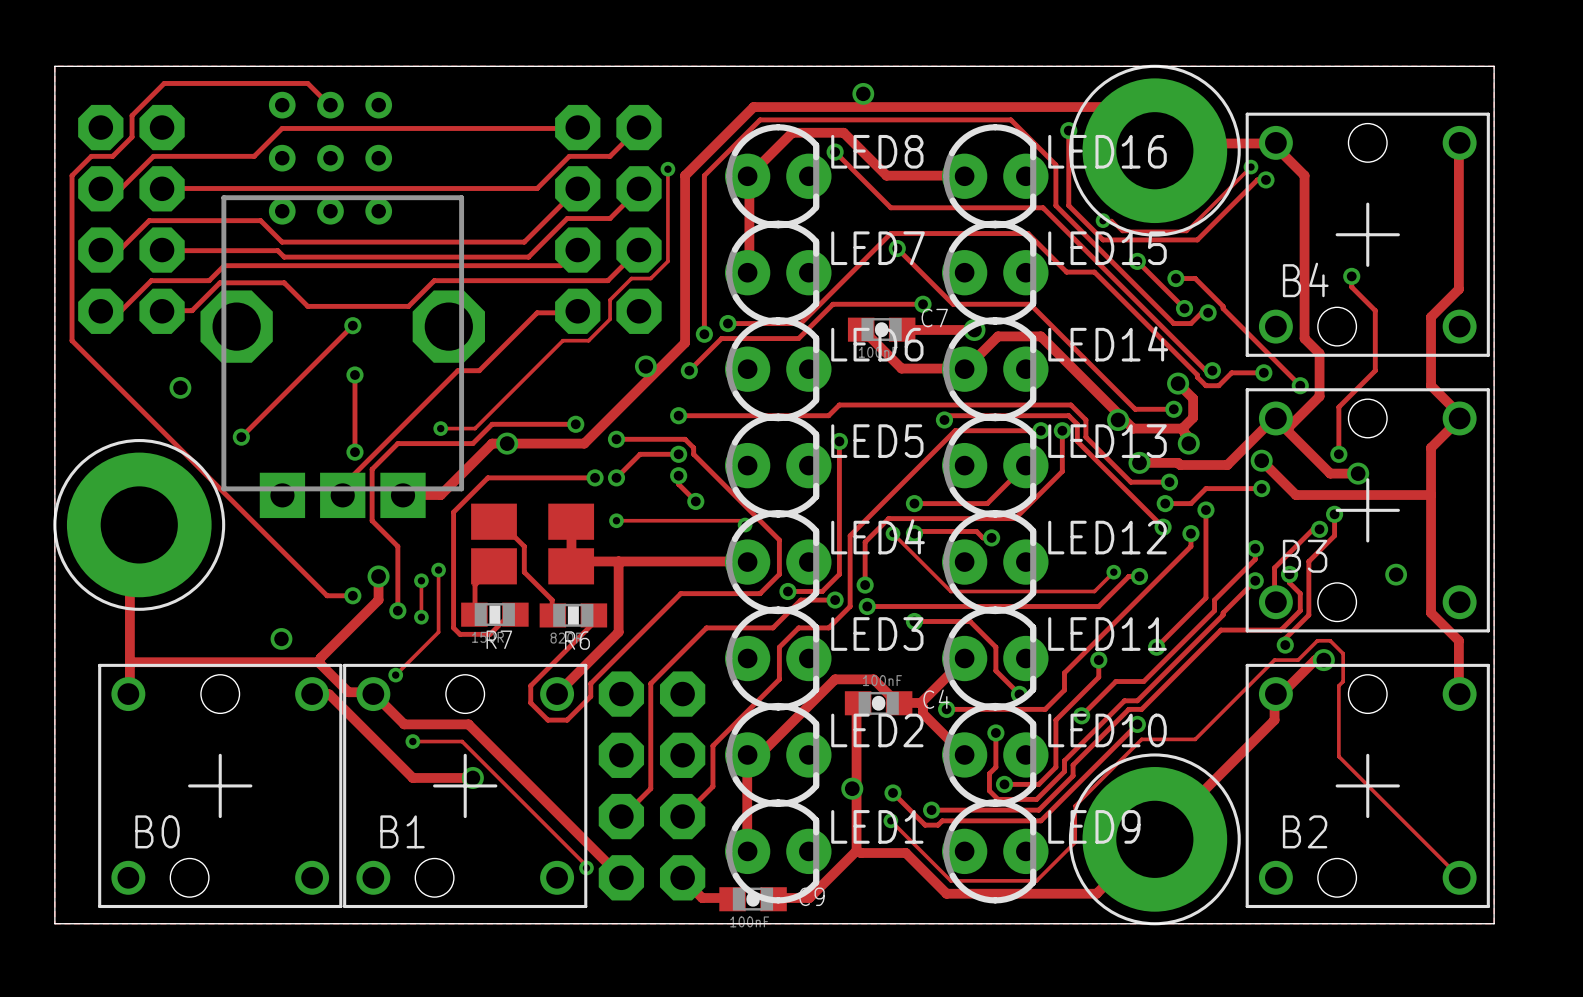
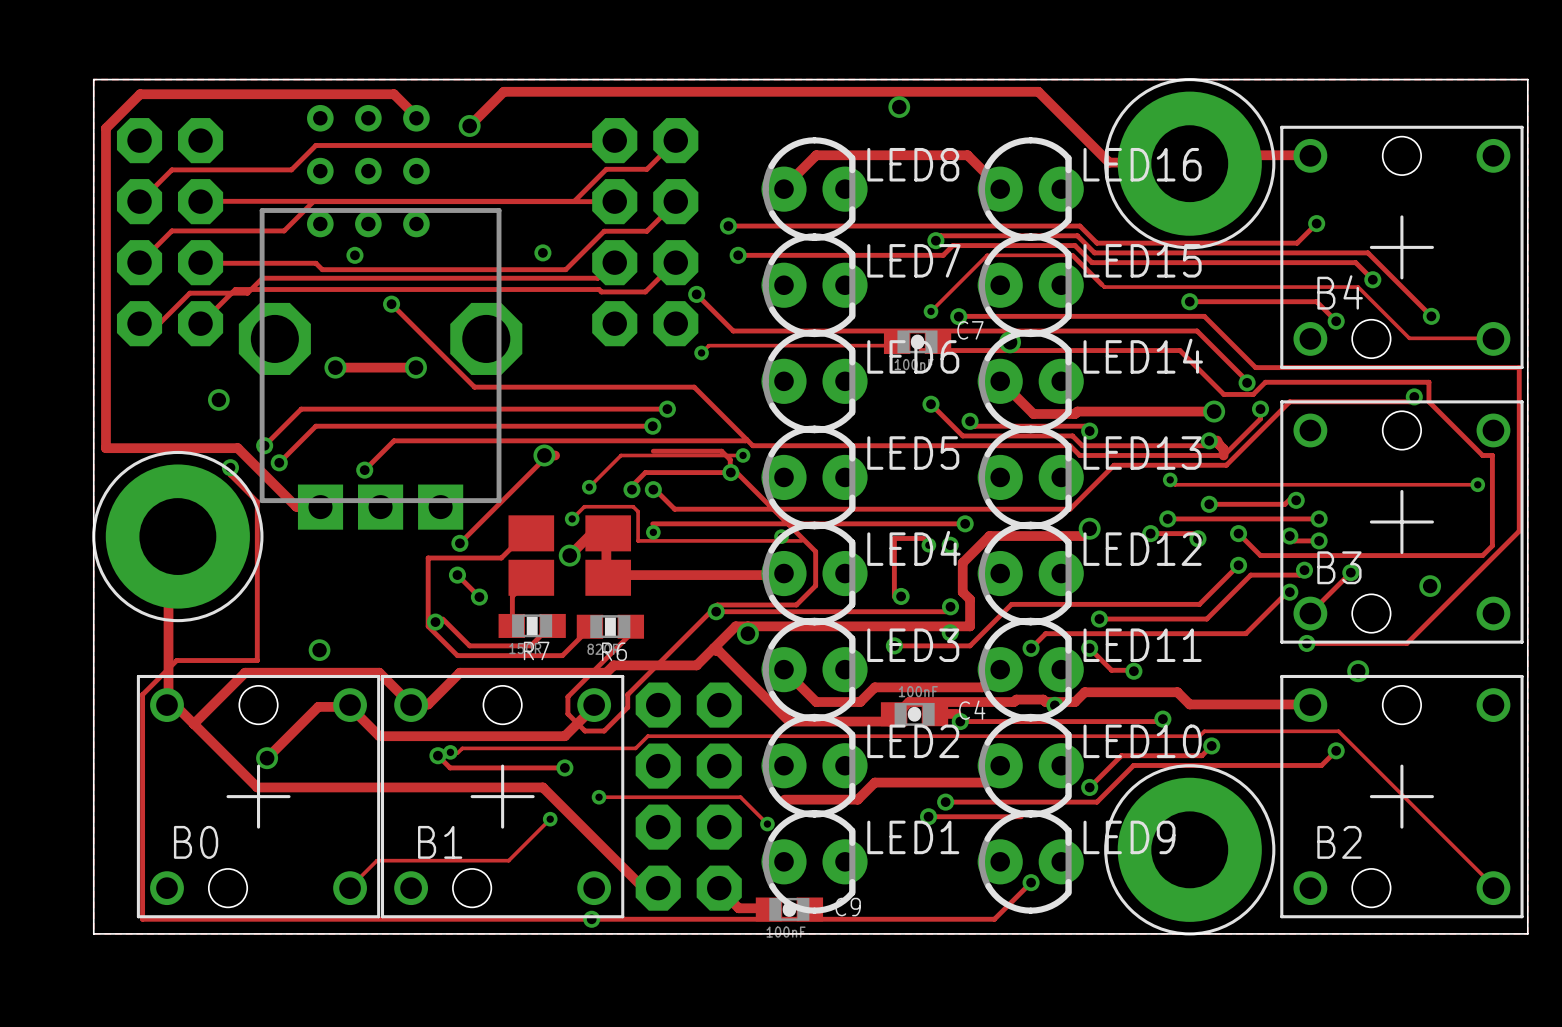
track: (330, 105) (307, 83) (164, 83) (132, 115) (132, 137) (112, 156) (91, 156) (72, 175) (72, 340) (327, 595) (352, 595) -> none
track: none -> (416, 118) (394, 94) (140, 94) (105, 128) (105, 448) (237, 448) (296, 506) (320, 507)
track: none -> (469, 125) (503, 91) (1038, 91) (1109, 162) (1206, 162) (1214, 155) (1310, 155)
via: none -> (469, 125)
track: (577, 127) (282, 128) (254, 156) (153, 156) (121, 188) (100, 188) -> (614, 140) (608, 145) (315, 145) (291, 169) (171, 169) (139, 201)
track: (1068, 130) (1068, 205) (1103, 239) (1197, 239) (1257, 179) (1265, 179) -> none
via: (1068, 130) -> none
track: (1459, 142) (1458, 289) (1431, 317) (1431, 385) (1458, 413) (1459, 418) (1431, 447) (1431, 612) (1458, 640) (1459, 694) -> none
track: (835, 152) (890, 207) (1043, 207) (1205, 370) (1212, 370) -> none
via: (835, 152) -> none
track: (1250, 167) (1186, 231) (1122, 231) (1111, 220) (1103, 220) -> none
via: (1250, 167) -> none
track: (667, 169) (667, 261) (650, 278) (631, 278) (610, 299) (610, 319) (588, 340) (562, 340) (475, 428) (440, 428) -> none
via: (667, 169) -> none
track: (964, 176) (886, 175) (843, 132) (792, 132) (747, 176) (749, 179) (749, 272) (747, 272) -> (1000, 189) (967, 155) (816, 155) (784, 189)
via position: (1265, 179) -> (1316, 223)
track: (577, 188) (524, 242) (282, 242) (260, 220) (149, 220) (121, 248) (100, 250) -> (614, 201) (313, 201) (284, 230) (171, 230) (139, 262)
track: none -> (1316, 223) (1297, 243) (1096, 243) (1079, 226) (728, 226)
via: none -> (728, 226)
via: (1103, 220) -> none
track: none -> (935, 240) (940, 235) (1077, 235) (1094, 252) (1367, 252) (1431, 316)
via: none -> (542, 252)
via: none -> (354, 255)
track: none -> (738, 255) (943, 255) (952, 245) (1075, 245) (1092, 262) (1355, 262) (1372, 279)
via: none -> (738, 255)
track: (1037, 242) (1028, 233) (890, 233) (800, 323) (727, 323) -> (1072, 255) (987, 255) (931, 311)
track: (897, 248) (953, 304) (1030, 304) (1135, 409) (1173, 409) -> none
via position: (897, 248) -> (935, 240)
track: (638, 250) (607, 280) (434, 280) (408, 306) (307, 306) (284, 282) (219, 282) (192, 310) (162, 311) -> (675, 262) (645, 291) (601, 291) (599, 289) (235, 289) (200, 323)
track: (1137, 261) (1184, 308) -> none
via: (1137, 261) -> none
track: (1066, 272) (1094, 272) (1205, 385) (1218, 385) (1231, 372) (1263, 372) -> (1101, 284) (1104, 287) (1358, 287) (1409, 338) (1493, 338)
track: (1351, 276) (1351, 287) (1375, 310) (1375, 370) (1338, 407) (1338, 454) -> none
via position: (1351, 276) -> (1372, 279)
track: (1175, 278) (1195, 278) (1300, 385) -> none
via: (1175, 278) -> none
track: none -> (696, 294) (733, 331) (1197, 331) (1245, 379)
via: none -> (696, 294)
track: none -> (1189, 301) (1316, 301) (1336, 321)
via: none -> (1189, 301)
track: none -> (391, 304) (474, 387) (694, 387) (752, 445) (1070, 445) (1079, 455) (1223, 455) (1260, 418) (1260, 409)
via: none -> (931, 311)
track: none -> (960, 316) (1204, 316) (1255, 367) (1519, 367) (1519, 531) (1406, 643) (1306, 643)
via: none -> (1431, 316)
track: (923, 304) (832, 304) (798, 338) (721, 338) (689, 370) -> none
via: (1184, 308) -> none
via: none -> (1336, 321)
track: (577, 311) (537, 312) (479, 370) (457, 370) (344, 484) (342, 495) -> none
track: (1208, 312) (1201, 312) (1190, 323) (1173, 323) (1055, 205) (1055, 164) (1010, 119) (760, 119) (704, 175) (704, 334) -> none
via: (1208, 312) -> none
via: (727, 323) -> none
track: (352, 325) (241, 437) -> none
via position: (352, 325) -> (391, 304)
track: (861, 329) (901, 368) (964, 369) (998, 336) (1040, 336) (1133, 428) (1182, 428) (1193, 417) (1193, 398) (1178, 383) -> none
track: (902, 329) (974, 329) -> none
track: none -> (896, 345) (708, 345) (701, 352)
via: (704, 334) -> none
track: none -> (921, 350) (1179, 350) (1223, 394) (1253, 394) (1265, 382) (1428, 382) (1428, 401) (1482, 455) (1492, 455) (1492, 545) (1482, 555) (1260, 555) (1238, 533)
via: none -> (701, 352)
track: none -> (335, 367) (415, 367)
via: none -> (335, 367)
via: none -> (415, 367)
via: (645, 366) -> none
track: none -> (1000, 381) (1033, 413) (1075, 413) (1077, 411) (1214, 411)
via: (689, 370) -> none
via: (1263, 372) -> none
track: (354, 374) (354, 452) -> none
via: (354, 374) -> none
via position: (1178, 383) -> (1214, 411)
track: none -> (1414, 396) (1409, 401) (1289, 401) (1226, 465) (1114, 465) (1070, 509) (674, 509) (652, 487)
via: none -> (1414, 396)
via: (1300, 385) -> none
track: none -> (931, 404) (962, 435) (1072, 435) (1082, 445) (1204, 445) (1209, 440)
via: none -> (931, 404)
track: none -> (667, 409) (301, 409) (264, 445)
via: none -> (667, 409)
via: none -> (1260, 409)
track: none -> (970, 421) (974, 426) (1084, 426) (1089, 431)
via position: (1173, 409) -> (1209, 440)
track: none -> (652, 426) (315, 426) (279, 462)
via: none -> (652, 426)
track: (678, 415) (828, 415) (839, 405) (1070, 405) (1085, 420) (1085, 437) (1130, 482) (1169, 482) -> none
via: (678, 415) -> none
track: (1275, 418) (1289, 426) (1319, 396) (1319, 353) (1304, 338) (1304, 175) (1276, 147) (1275, 142) (1163, 143) (1156, 149) (1150, 149) (1107, 107) (753, 107) (685, 175) (685, 342) (584, 443) -> (743, 455) (621, 455)
track: (1275, 418) (1330, 473) (1358, 473) -> none
track: (1275, 418) (1227, 465) (1139, 462) -> none
via: none -> (1089, 431)
track: (944, 420) (948, 415) (1068, 415) (1077, 424) (1077, 441) (1163, 527) -> none
via position: (944, 420) -> (970, 421)
via: (1118, 420) -> none
track: (575, 424) (492, 424) (472, 443) (397, 443) (372, 469) (372, 520) (397, 546) (397, 610) -> none
via: (575, 424) -> none
track: none -> (746, 439) (394, 440) (364, 470)
via: (440, 428) -> none
track: (1040, 430) (955, 430) (850, 535) (850, 606) (828, 627) (798, 627) (779, 647) (779, 679) (712, 745) (712, 786) (682, 816) -> none
via: (1040, 430) -> none
track: (1062, 430) (1062, 471) (1015, 518) (888, 518) (865, 542) (865, 585) -> none
via: (1062, 430) -> none
via: none -> (264, 445)
via: (241, 437) -> none
via: (616, 439) -> none
track: (839, 441) (839, 574) (822, 591) (787, 591) -> none
via: (839, 441) -> none
track: (510, 443) (492, 443) (440, 495) (403, 495) -> (547, 455) (459, 543)
track: (517, 443) (584, 443) -> (589, 487) (621, 455)
via: none -> (743, 455)
via: (1188, 443) -> none
via: none -> (279, 462)
via position: (354, 452) -> (364, 470)
track: (678, 454) (640, 454) (616, 477) -> none
via: (678, 454) -> none
via: (1338, 454) -> none
track: none -> (230, 467) (230, 475) (257, 501) (257, 660) (176, 660) (142, 694) (142, 919) (994, 919) (1031, 882)
via: none -> (230, 467)
track: none -> (730, 472) (645, 472) (630, 487)
via: none -> (730, 472)
track: (1261, 460) (1295, 495) (1431, 495) -> none
via: (1261, 460) -> none
via: (1139, 462) -> none
track: (1025, 465) (987, 503) (914, 503) -> none
track: none -> (1170, 479) (1175, 484) (1477, 484)
via: none -> (1477, 484)
via: (1358, 473) -> none
via: none -> (589, 487)
track: (678, 475) (678, 484) (695, 501) -> none
via: (678, 475) -> none
track: (595, 477) (487, 477) (453, 512) (453, 627) (460, 634) (490, 634) (509, 615) (515, 614) -> (442, 619) (469, 645) (530, 645) (552, 625)
via: (1169, 482) -> none
track: none -> (1289, 499) (1284, 504) (1209, 504)
track: (1261, 488) (1205, 488) (1190, 503) (1165, 503) -> none
via: none -> (1209, 504)
via: (695, 501) -> none
via position: (914, 503) -> (965, 523)
via: (1165, 503) -> none
track: none -> (572, 518) (584, 506) (633, 506) (638, 511) (638, 540) (801, 540)
via: none -> (572, 518)
track: none -> (1167, 518) (1319, 518)
via: none -> (1167, 518)
via: none -> (1319, 518)
track: (1205, 510) (1205, 597) (1156, 647) -> none
via: (1205, 510) -> none
track: none -> (652, 523) (965, 523)
track: (1334, 514) (1334, 535) (1308, 561) (1308, 615) (1285, 638) (1285, 645) -> none
via: (1334, 514) -> none
track: none -> (1089, 528) (1082, 536) (989, 536) (962, 562) (962, 592) (970, 599) (970, 626) (735, 626) (696, 665) (613, 665) (606, 672) (459, 672) (428, 704) (411, 705) (379, 672) (245, 672) (193, 723)
via: none -> (1089, 528)
track: (616, 520) (740, 520) (745, 525) -> none
track: (494, 521) (500, 522) (524, 546) (524, 572) (552, 600) (552, 615) -> (531, 533) (525, 533) (501, 558) (428, 558) (428, 626) (457, 655) (562, 655) (589, 626)
track: (571, 521) (571, 566) (575, 561) (747, 562) -> (569, 555) (591, 533) (608, 533) (606, 538) (606, 577) (611, 575) (782, 575) (784, 573)
track: none -> (1150, 533) (1197, 533)
via: none -> (1150, 533)
via: none -> (1238, 533)
track: none -> (1289, 536) (1294, 540) (1319, 540)
via: none -> (1289, 536)
track: none -> (923, 538) (894, 538) (894, 597)
via: none -> (1319, 540)
track: (1319, 529) (1313, 529) (1274, 567) (1275, 602) -> (1350, 572) (1310, 613)
via: (1319, 529) -> none
via: none -> (459, 543)
track: (893, 533) (950, 591) (1094, 591) (1113, 572) -> none
track: (914, 533) (916, 531) (976, 531) (983, 537) (991, 537) -> none
track: (1190, 533) (1190, 546) (1064, 672) (1064, 690) (1045, 709) (946, 709) -> none
via: (1190, 533) -> none
via: (991, 537) -> none
via: none -> (569, 555)
track: (1255, 548) (1255, 559) (1214, 600) (1214, 610) (1143, 681) (1115, 681) (1081, 715) -> none
via position: (1255, 548) -> (1304, 570)
track: none -> (1238, 565) (1199, 604) (1011, 604) (970, 645) (894, 645)
via: none -> (1238, 565)
track: none -> (1304, 570) (1299, 575) (1250, 575) (1206, 619) (1099, 619)
track: (618, 561) (618, 632) (557, 694) -> none
via: none -> (1350, 572)
track: none -> (457, 575) (479, 597)
via: none -> (457, 575)
track: (438, 570) (438, 632) (395, 675) -> none
via position: (438, 570) -> (479, 597)
via position: (1113, 572) -> (1170, 479)
track: (1289, 574) (1289, 582) (1300, 593) (1300, 610) (1280, 630) (1220, 630) (1141, 709) (1128, 709) (1073, 765) (1073, 775) (1038, 810) (931, 810) -> none
via: (1289, 574) -> none
track: (378, 576) (378, 600) (318, 662) -> none
via: (378, 576) -> none
track: (1139, 576) (1128, 576) (1098, 606) (867, 606) -> none
via: (1139, 576) -> none
track: none -> (1289, 589) (1245, 633) (1045, 633) (1031, 648)
track: (421, 580) (421, 617) -> none
via: (421, 580) -> none
track: (1255, 580) (1137, 700) (1124, 700) (1064, 760) (1064, 771) (1036, 799) (998, 799) (989, 790) (989, 773) (995, 767) (995, 732) -> none
via: (787, 591) -> none
via: (352, 595) -> none
track: none -> (950, 606) (945, 611) (716, 611)
via: none -> (950, 606)
via: none -> (716, 611)
track: (835, 600) (800, 600) (772, 627) (706, 627) (650, 683) (650, 788) (621, 816) -> none
via: (835, 600) -> none
via: (867, 606) -> none
via: none -> (1099, 619)
via: (421, 617) -> none
track: (914, 621) (970, 621) (995, 647) (995, 670) (1019, 694) -> none
via: none -> (747, 633)
via: none -> (894, 645)
track: none -> (713, 648) (718, 650) (789, 721) (889, 721) (909, 702) (1013, 702) (1016, 699) (1075, 702) (1084, 692) (1177, 692) (1189, 704) (1310, 705)
via: none -> (1031, 648)
track: none -> (1089, 648) (1111, 670) (1133, 670)
via: none -> (1089, 648)
via position: (1285, 645) -> (1306, 643)
via: (1156, 647) -> none
track: (964, 658) (920, 702) (923, 713) (964, 754) -> (1000, 669) (982, 687) (874, 687) (860, 702) (816, 702) (784, 669)
track: (1098, 660) (1098, 677) (1055, 720) (1055, 767) (1038, 784) (1004, 784) -> none
track: (1323, 660) (1315, 660) (1280, 694) (1274, 694) (1274, 720) (1156, 837) (1150, 840) (1096, 893) (946, 893) (905, 853) (860, 853) (856, 850) -> none
track: (129, 662) (318, 662) -> none
track: (318, 662) (348, 692) (372, 692) (404, 724) (468, 724) (621, 877) -> (166, 705) (174, 704) (257, 787) (542, 787) (642, 887) (658, 888)
via: (395, 675) -> none
track: (312, 694) (329, 694) (412, 777) (472, 777) -> (350, 705) (379, 736) (564, 736) (594, 705)
track: none -> (350, 705) (350, 706) (318, 706) (267, 758)
track: (858, 703) (856, 705) (856, 850) -> none
track: (899, 703) (873, 679) (835, 679) (762, 752) (751, 752) (747, 754) (747, 851) -> none
track: none -> (1162, 719) (1160, 721) (960, 721)
via position: (946, 709) -> (960, 721)
via: (1081, 715) -> none
track: (1137, 724) (1040, 820) (942, 820) (938, 825) (925, 825) (893, 792) -> none
via position: (1137, 724) -> (1162, 719)
via: (995, 732) -> none
track: none -> (1211, 745) (1201, 755) (1121, 755) (1089, 787)
via: none -> (1211, 745)
track: none -> (1336, 750) (1321, 765) (1133, 765) (1096, 802) (945, 802)
via: none -> (1336, 750)
track: (412, 741) (462, 741) (586, 865) (586, 868) -> none
track: none -> (437, 755) (450, 767) (564, 767)
via: none -> (437, 755)
via: none -> (267, 758)
track: none -> (1000, 765) (984, 782) (874, 782) (857, 799) (784, 799)
via: none -> (564, 767)
via: none -> (1089, 787)
via: (472, 777) -> none
via: (1004, 784) -> none
track: none -> (599, 797) (740, 797) (767, 824)
via: none -> (599, 797)
via: (852, 788) -> none
via: none -> (945, 802)
via: (893, 792) -> none
track: none -> (928, 816) (1021, 816)
via: none -> (928, 816)
track: none -> (550, 819) (508, 860) (376, 860) (350, 888)
via: none -> (550, 819)
via: (931, 810) -> none
via: none -> (767, 824)
track: (890, 820) (950, 880) (1036, 880) (1075, 842) (1075, 805) (1141, 739) (1195, 739) (1274, 660) (1298, 660) (1317, 640) (1330, 640) (1343, 653) (1343, 681) (1338, 685) (1338, 756) (1459, 877) -> (457, 753) (462, 748) (635, 748) (647, 736) (1199, 736) (1204, 731) (1338, 731) (1494, 887) (1493, 888)
via: (890, 820) -> none
track: (856, 850) (809, 898) (773, 899) -> none
via: (586, 868) -> none
via: none -> (1031, 882)
via: none -> (591, 919)

